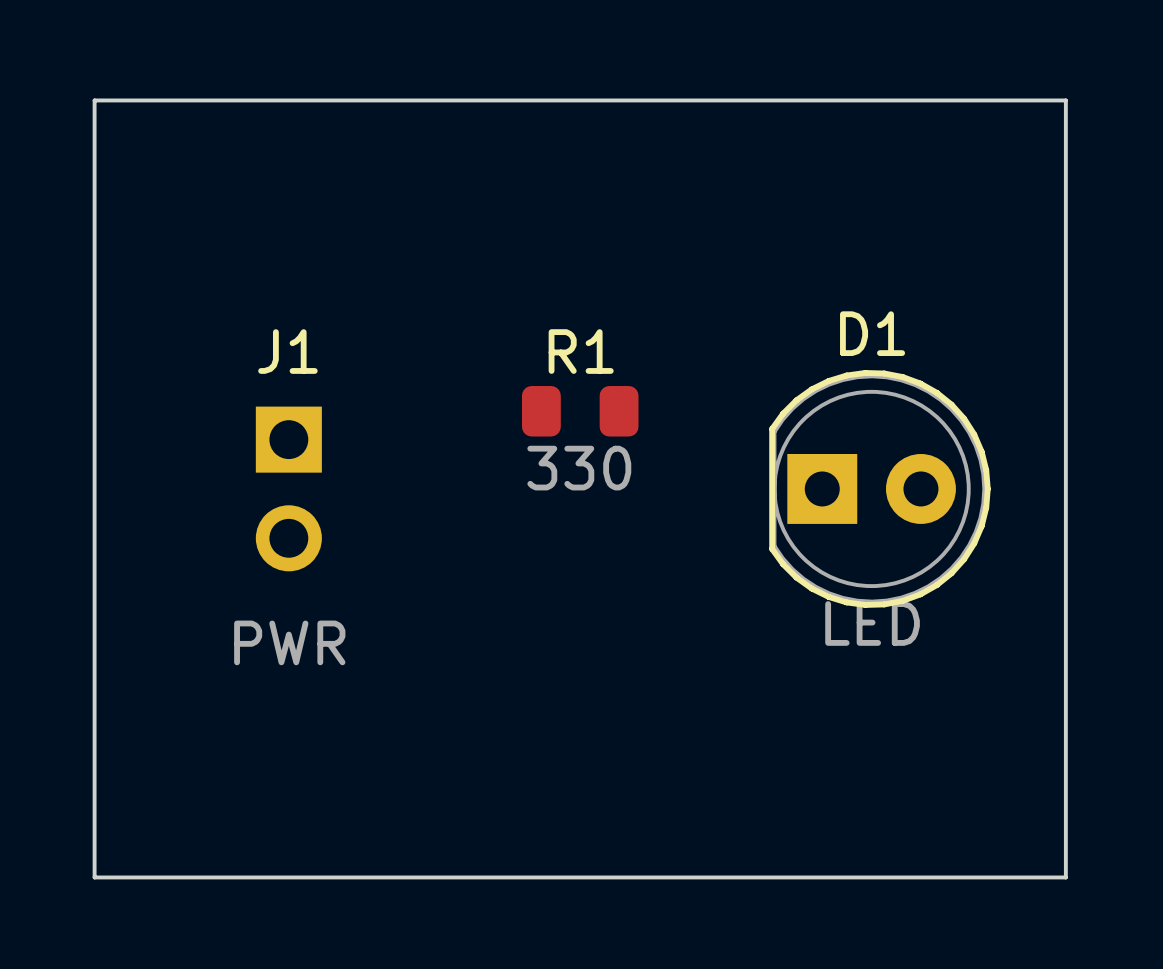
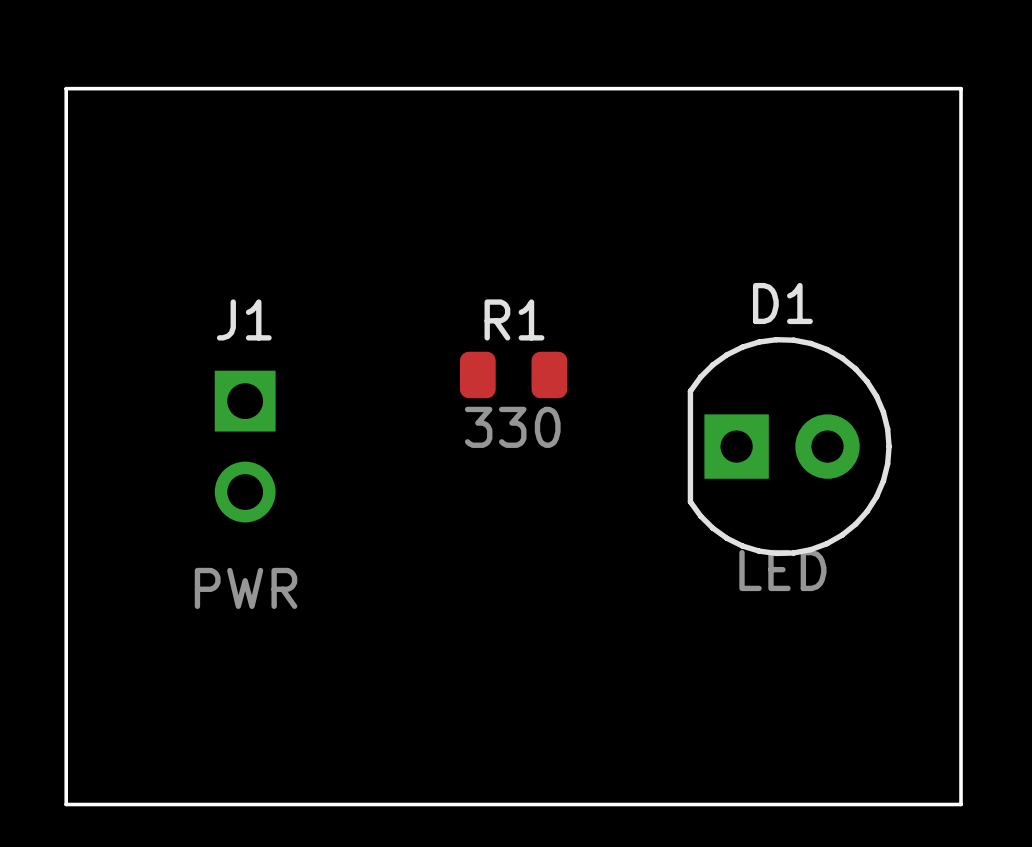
D1 footprint: [769, 370, 991, 608] -> [687, 337, 892, 557]

